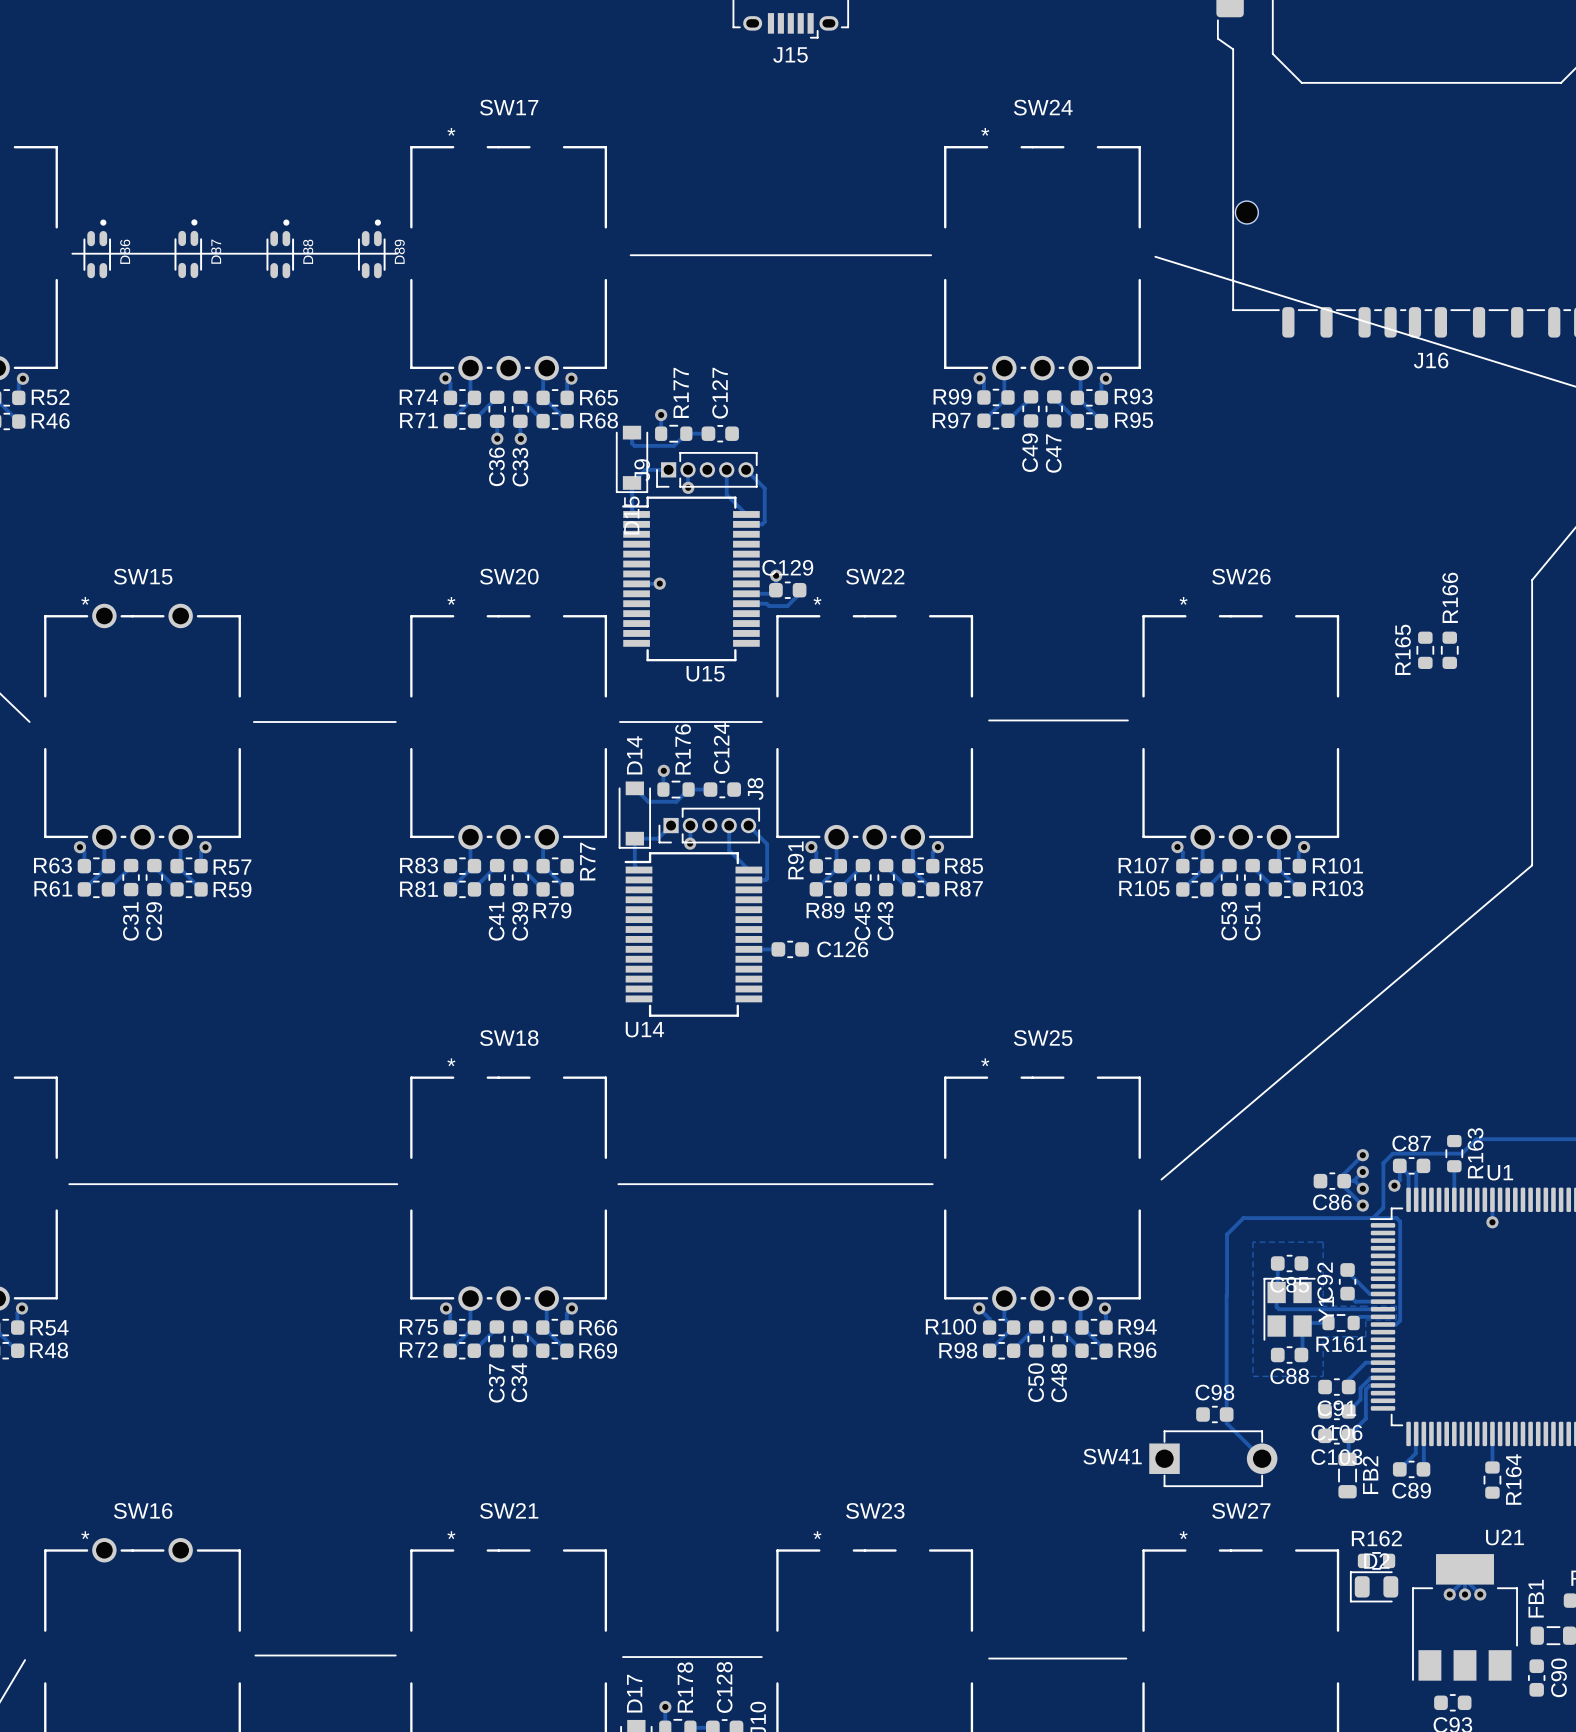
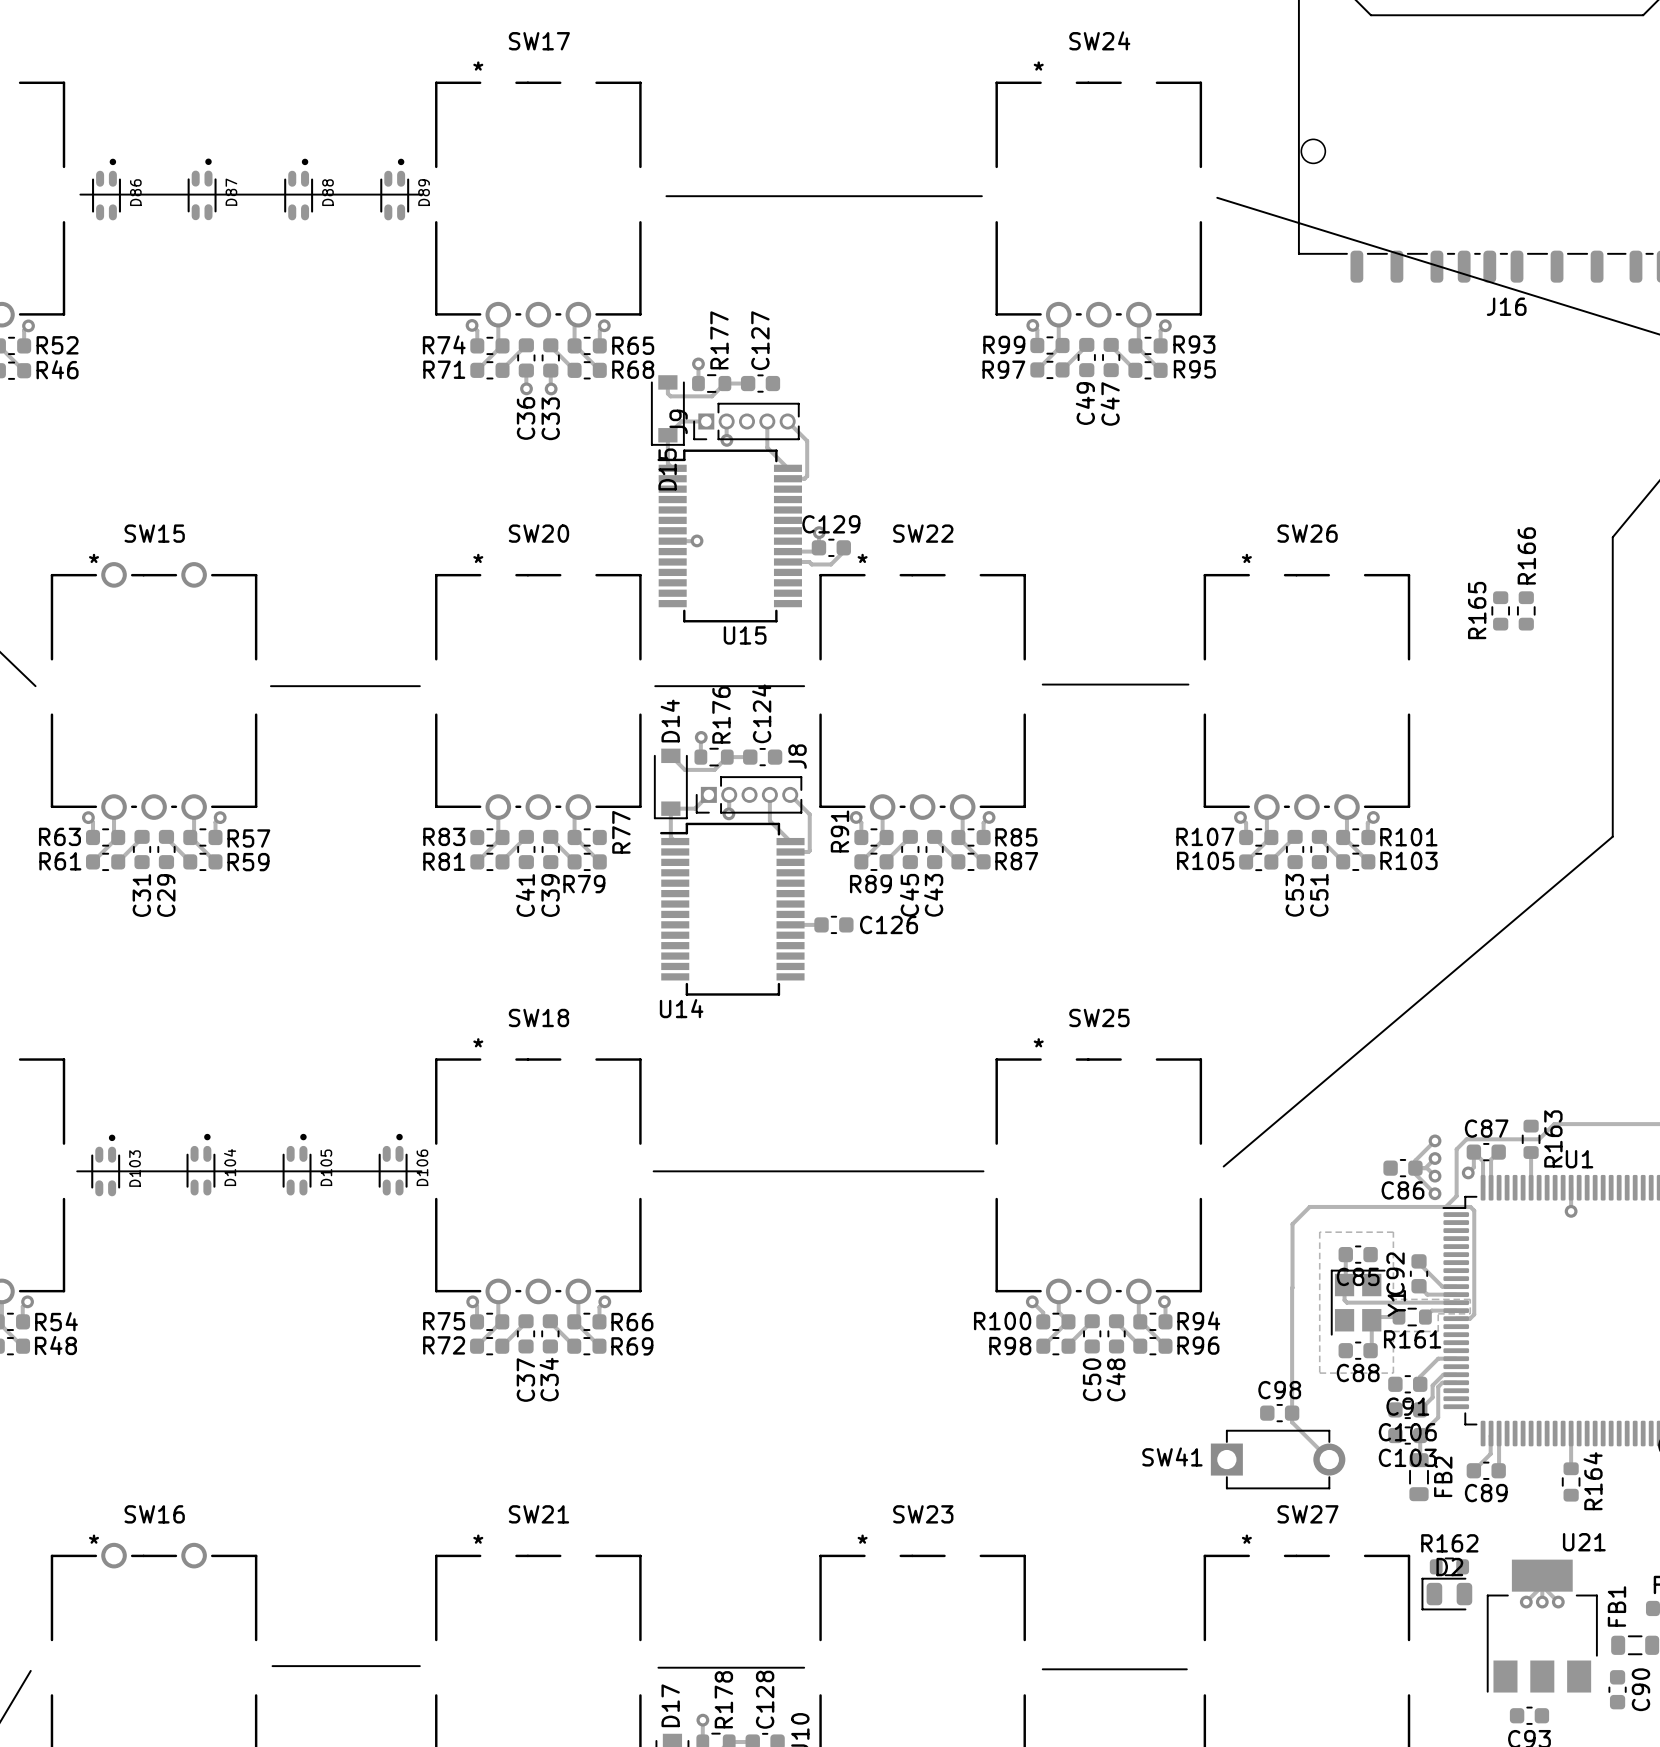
D104: none -> (200, 1164)
D105: none -> (297, 1164)
D106: none -> (393, 1164)
D103: none -> (105, 1165)

